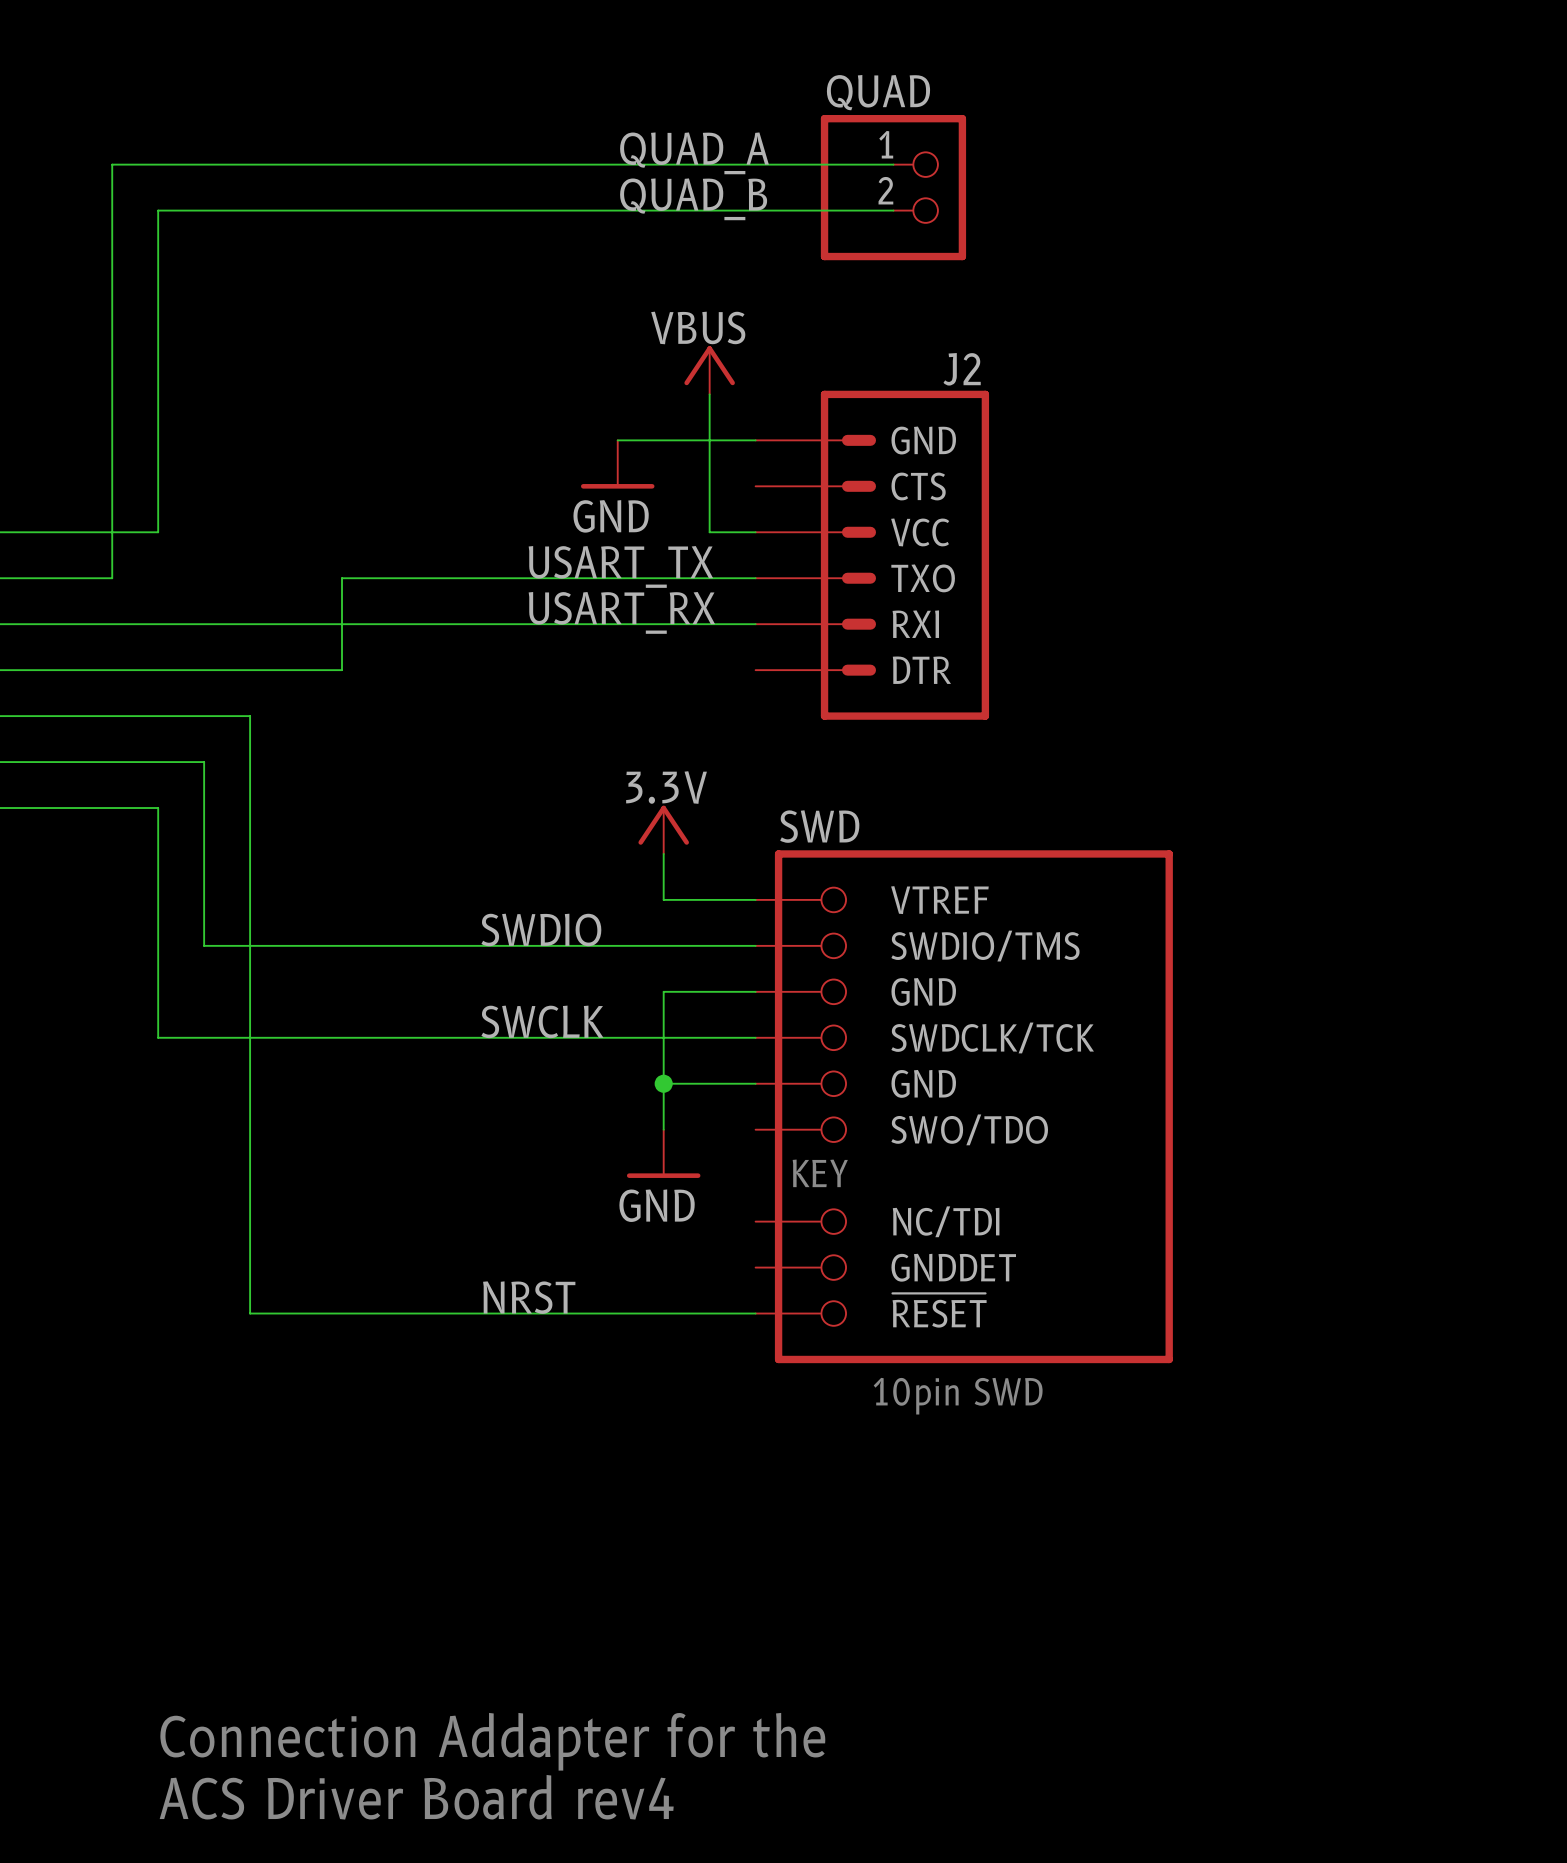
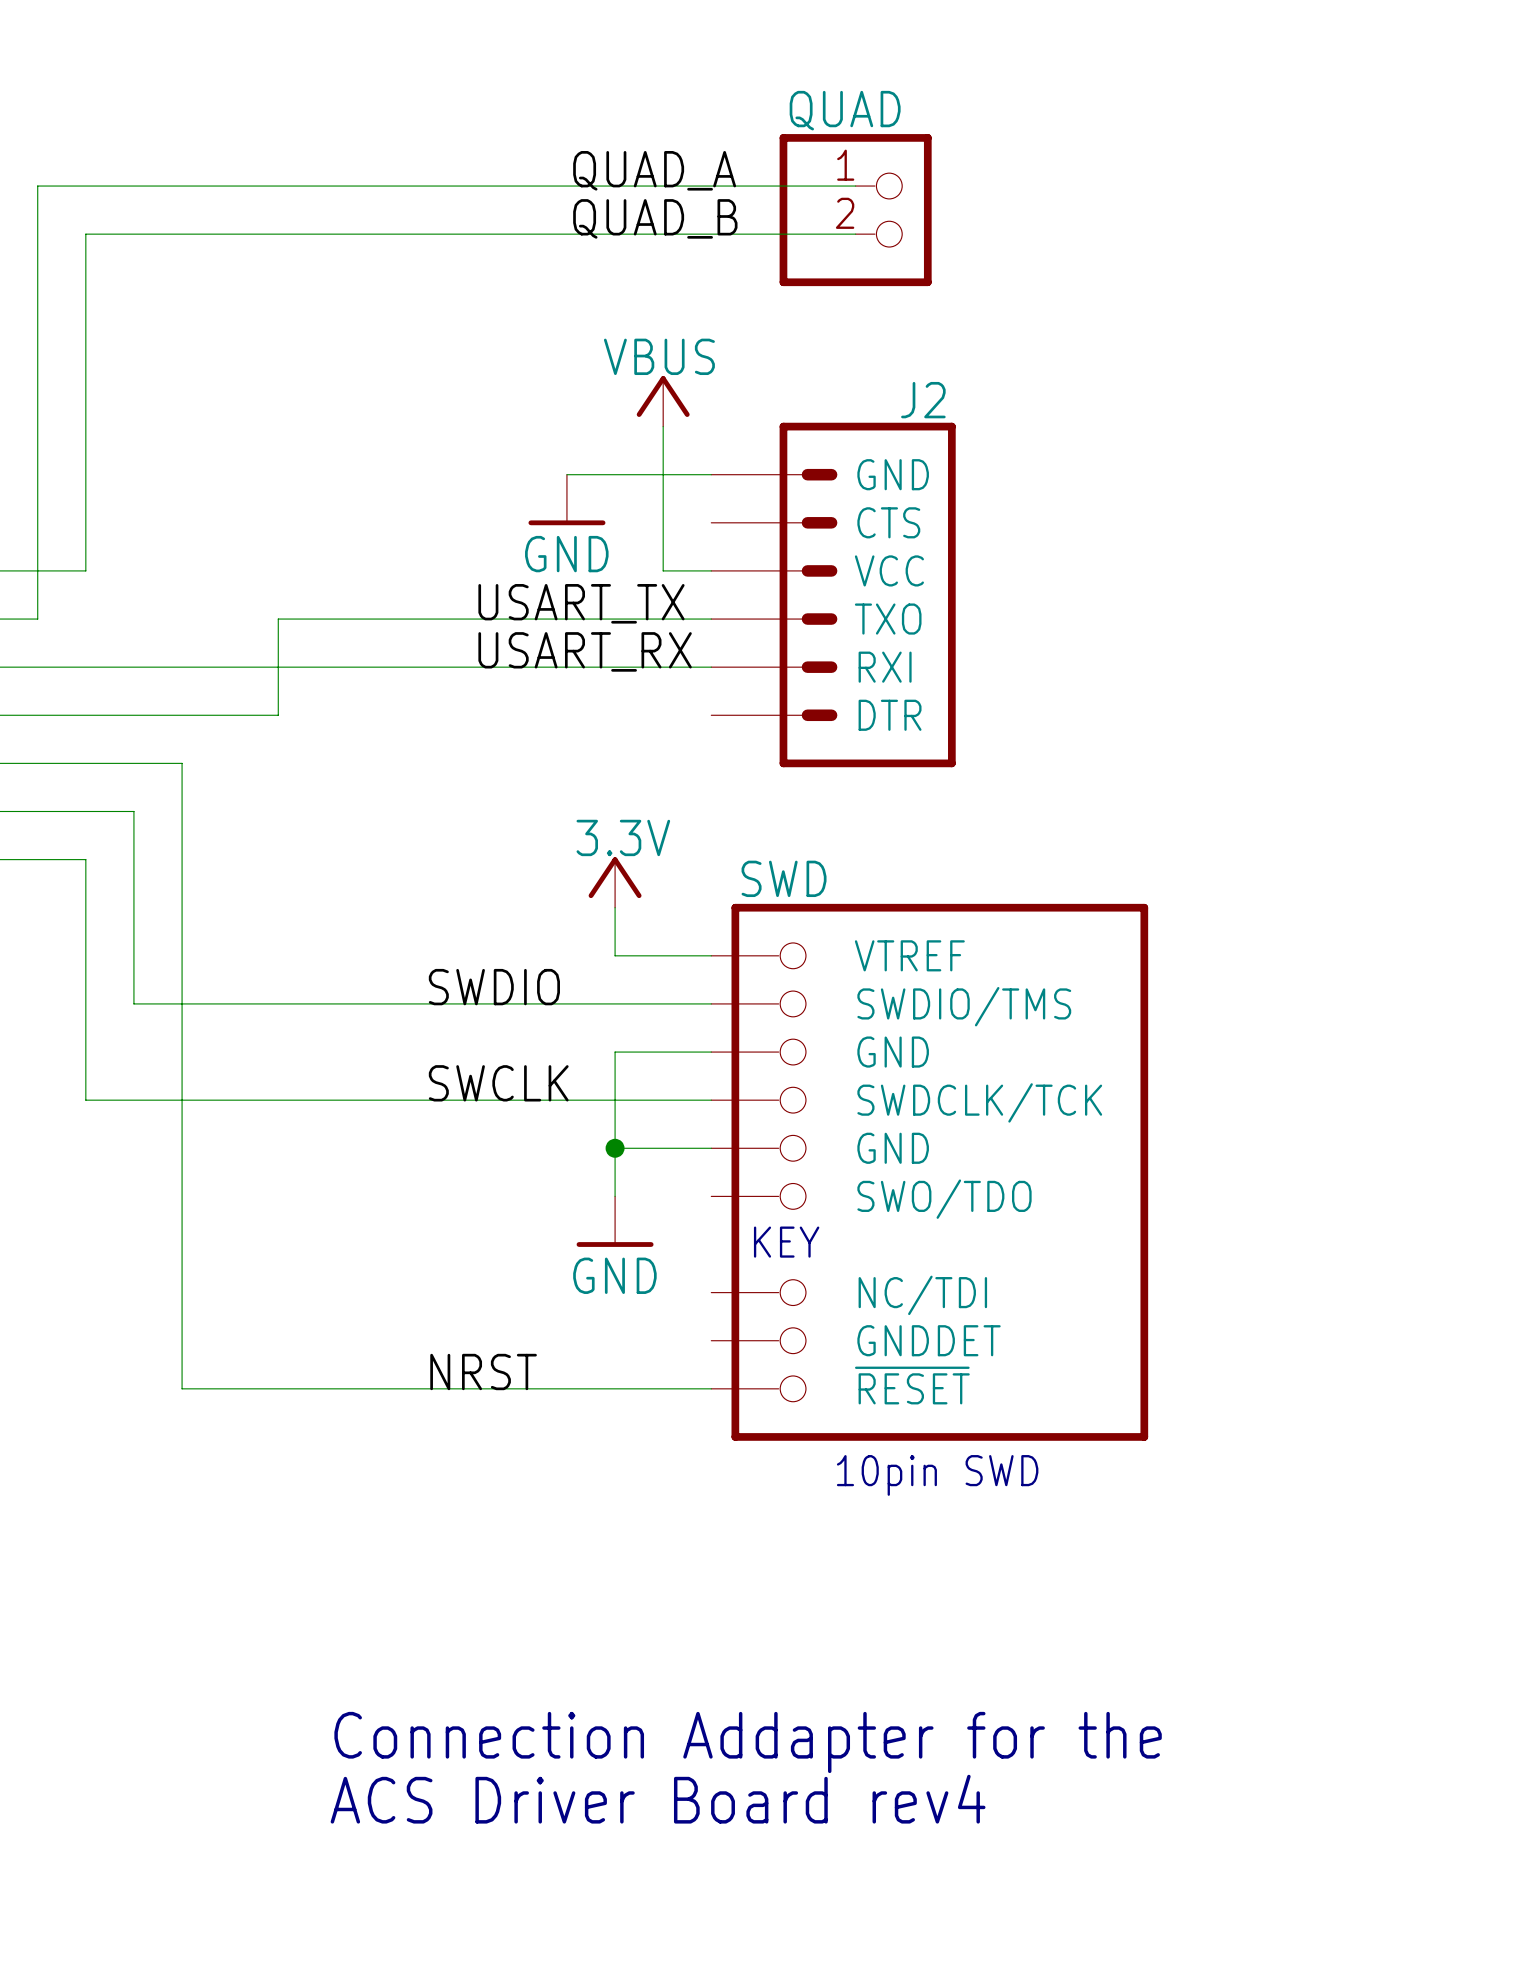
text position: Connection Addapter for the (492, 1741) -> Connection Addapter for the (748, 1742)
text position: ACS Driver Board rev4 (416, 1797) -> ACS Driver Board rev4 (658, 1799)

